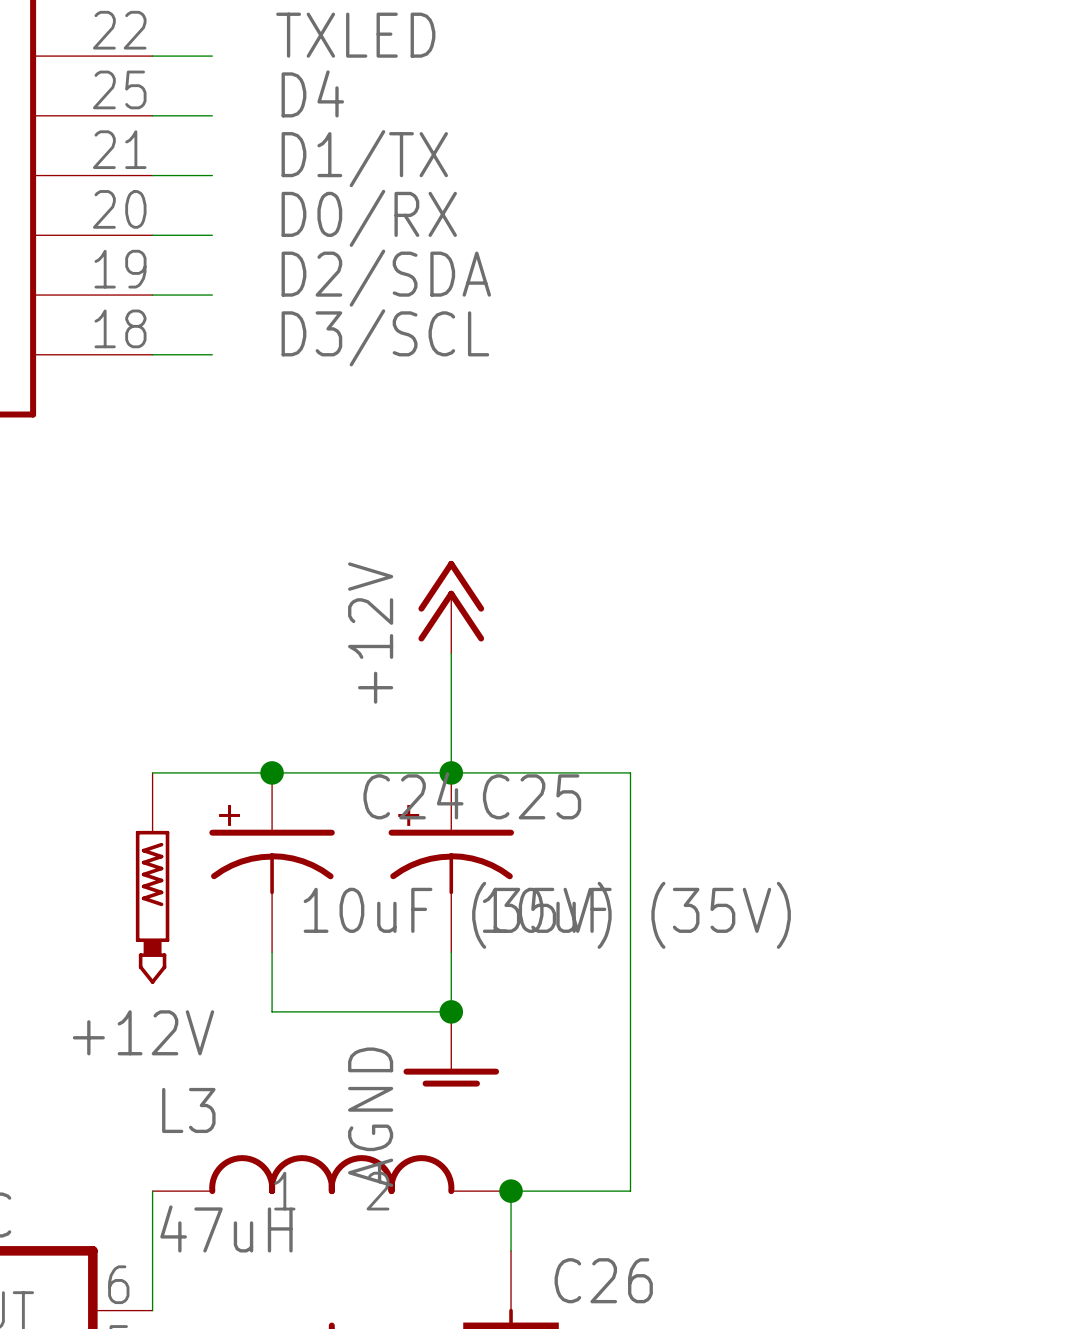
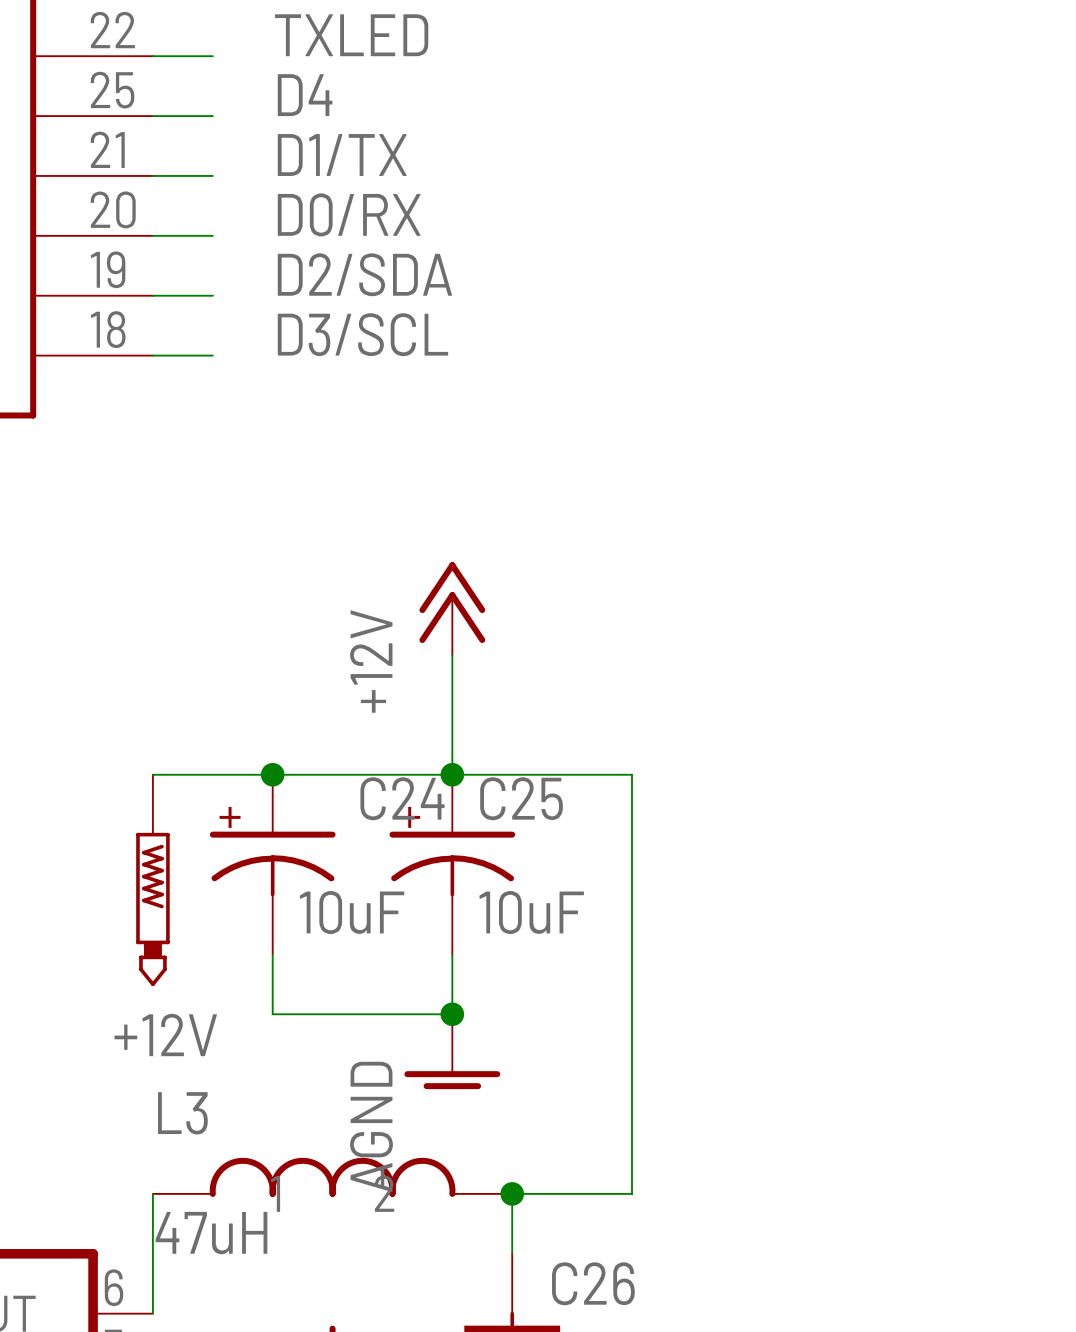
C24 value: 10uF (35V) (457, 915) -> 10uF (352, 912)
C25 value: 10uF (35V) (636, 915) -> 10uF (531, 912)

